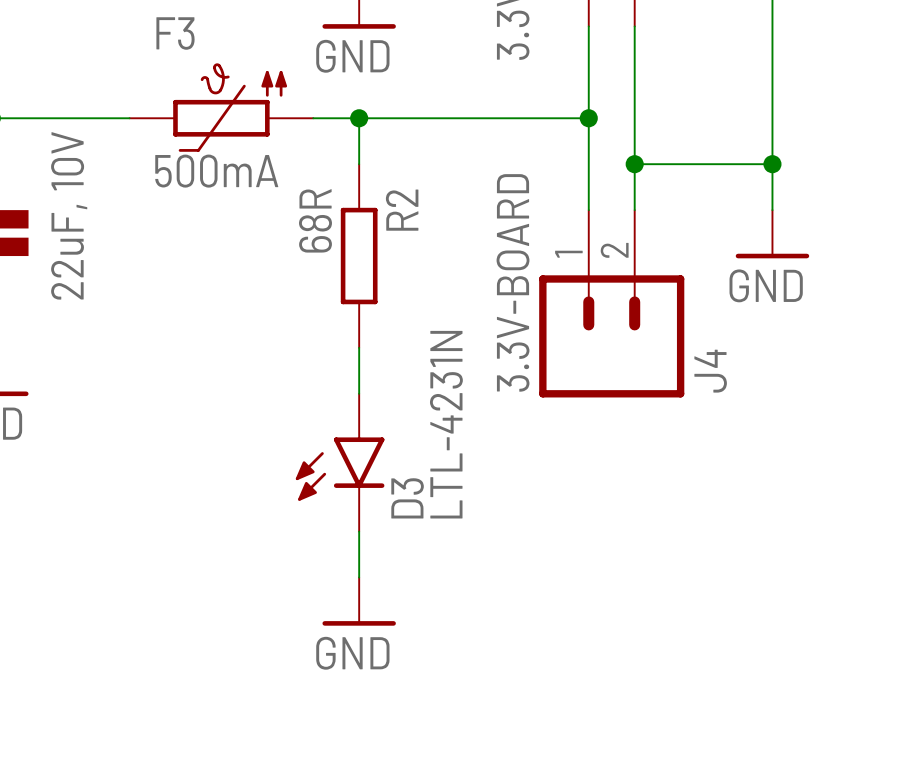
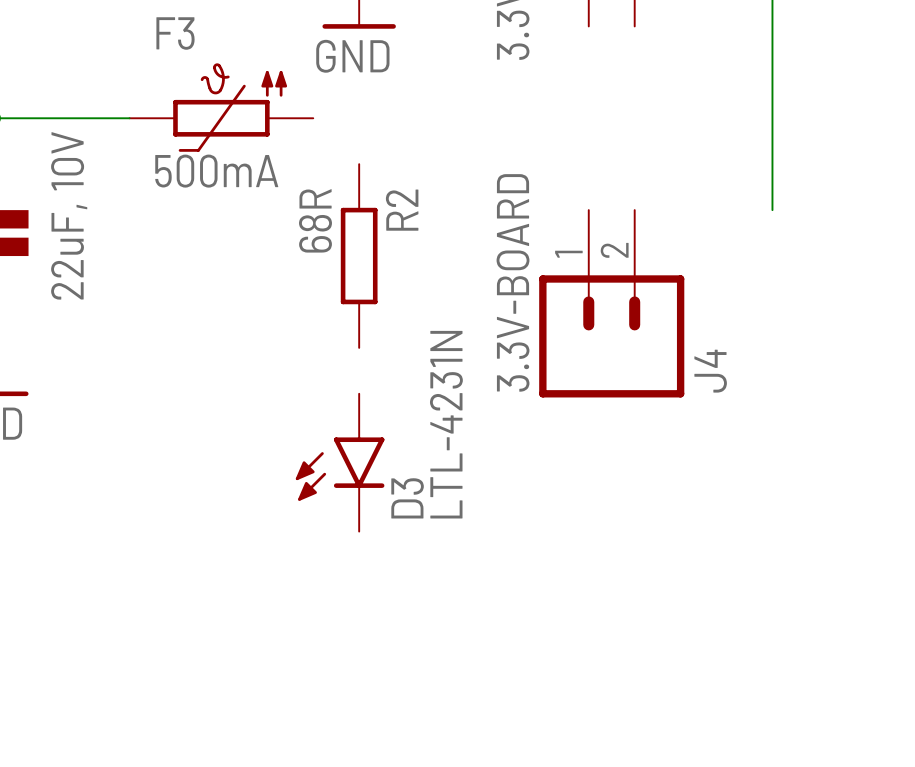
wire: (588, 26) (588, 210) -> none
wire: (634, 26) (634, 210) -> none
wire: (313, 118) (588, 118) -> none
wire: (359, 118) (359, 164) -> none
junction: (359, 118) -> none
junction: (588, 118) -> none
wire: (634, 164) (772, 164) -> none
junction: (634, 164) -> none
junction: (772, 164) -> none
power symbol: GND (772, 234) -> none
wire: (359, 347) (359, 393) -> none
wire: (359, 531) (359, 577) -> none
power symbol: GND (359, 601) -> none

